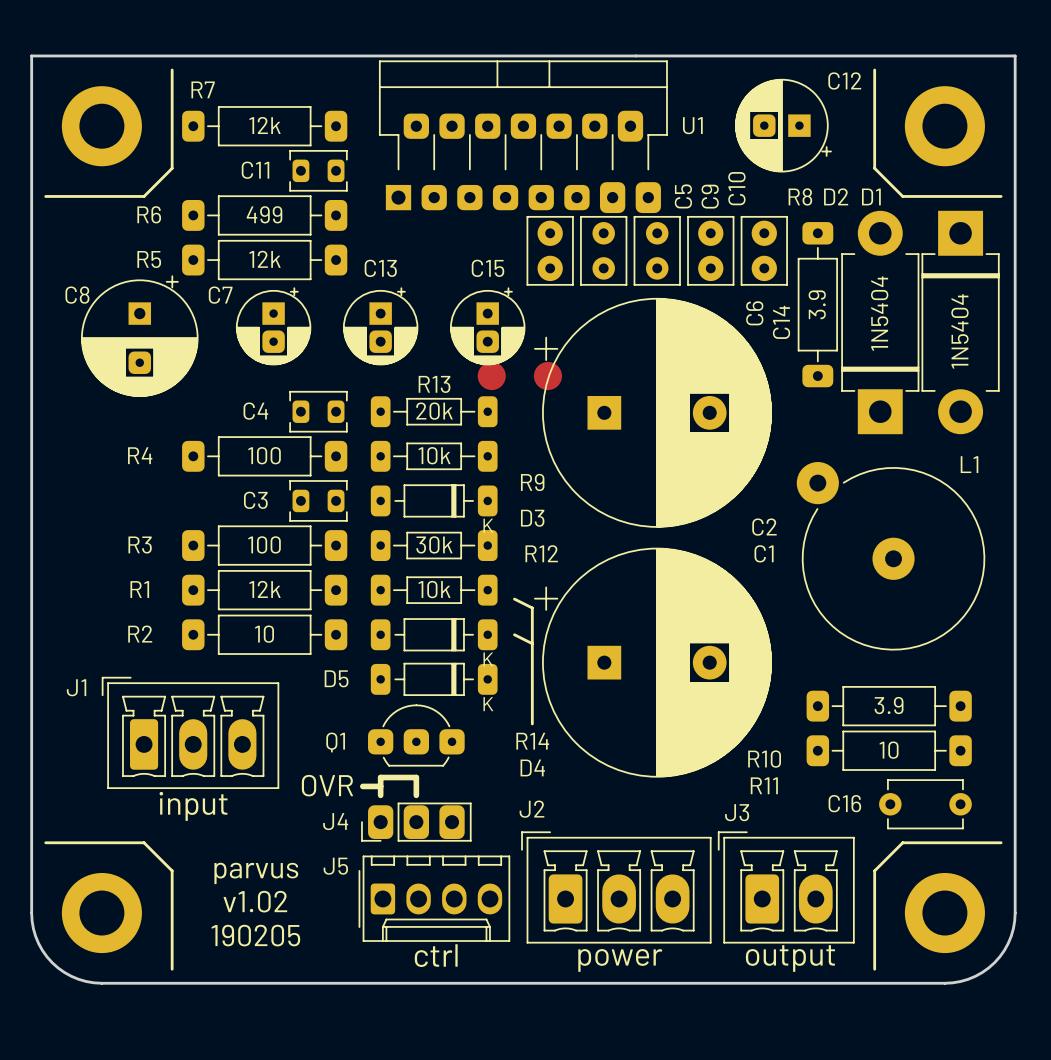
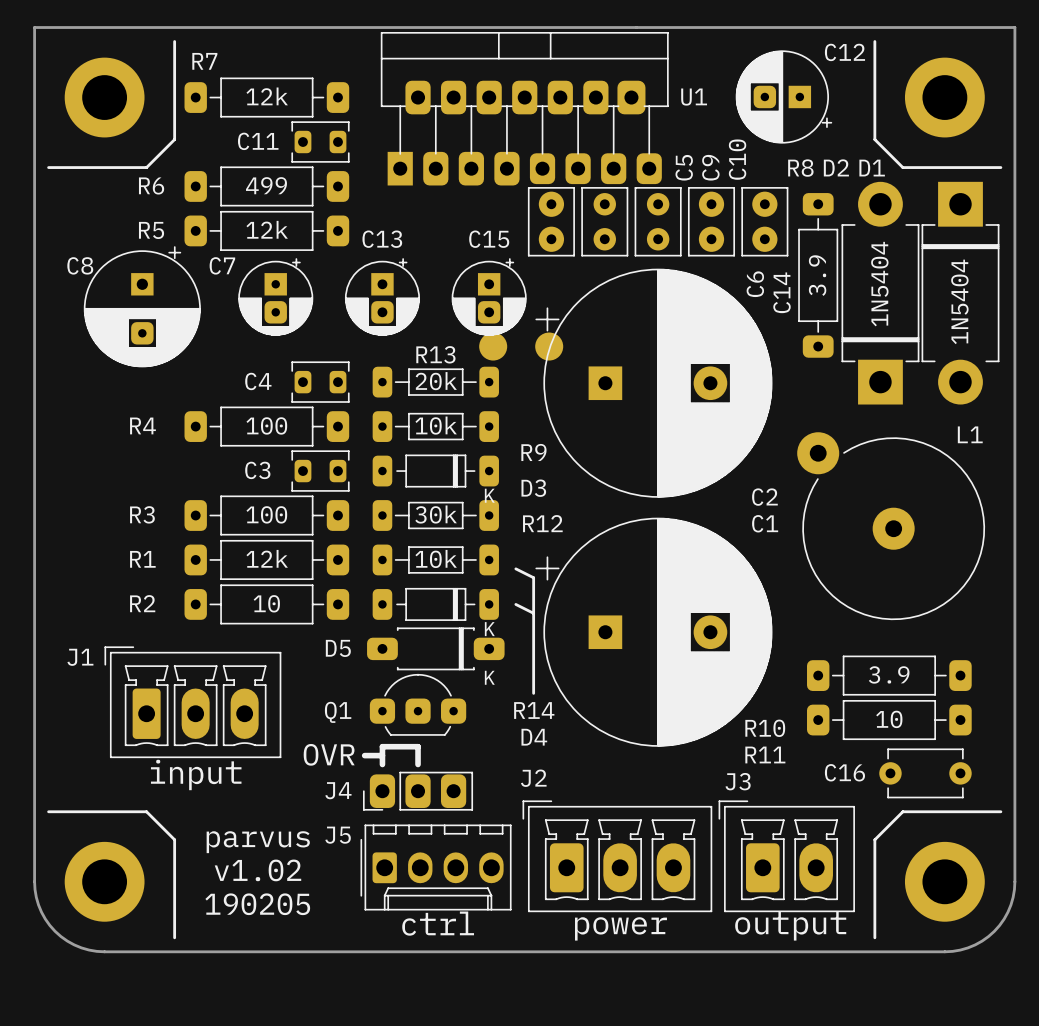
U1 footprint: [378, 60, 668, 214] -> [380, 31, 669, 186]
D5 footprint: [370, 662, 498, 696] -> [367, 627, 505, 671]

